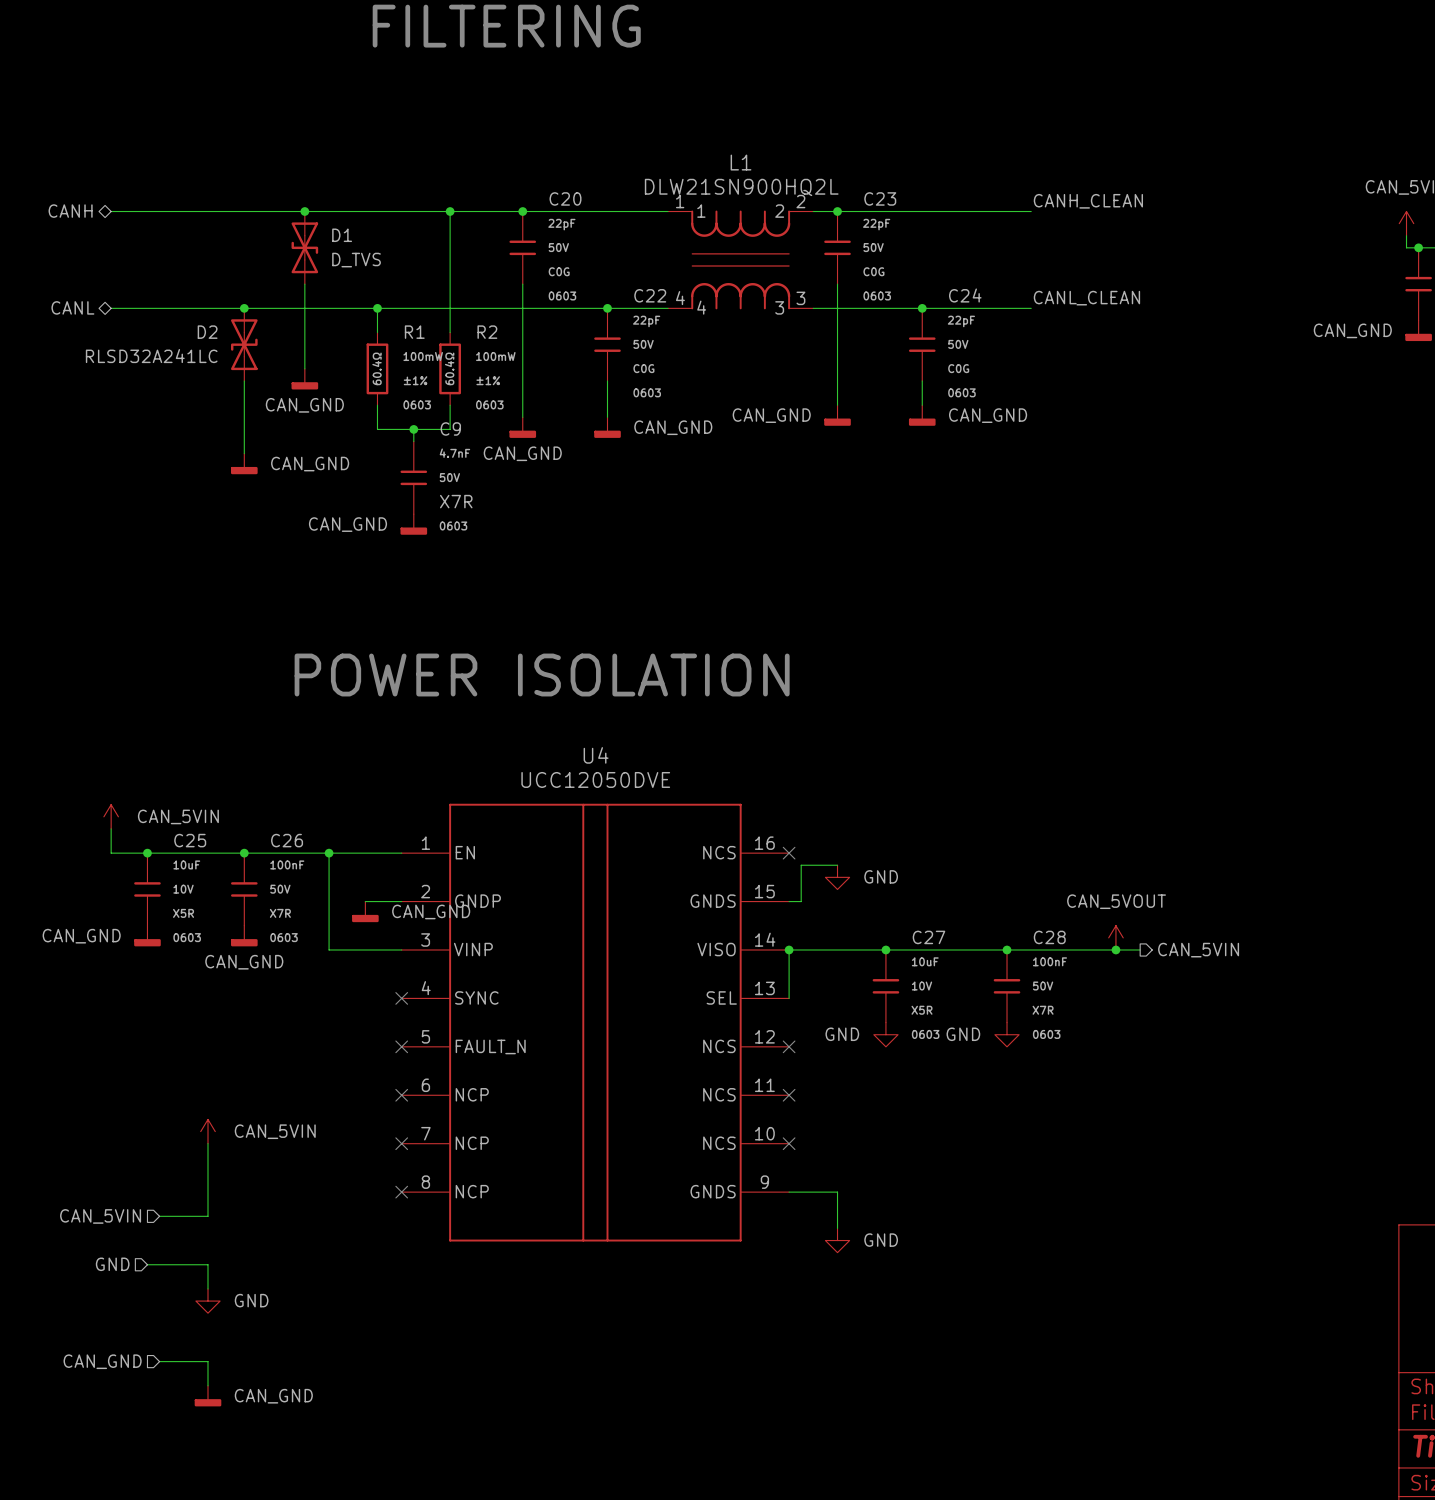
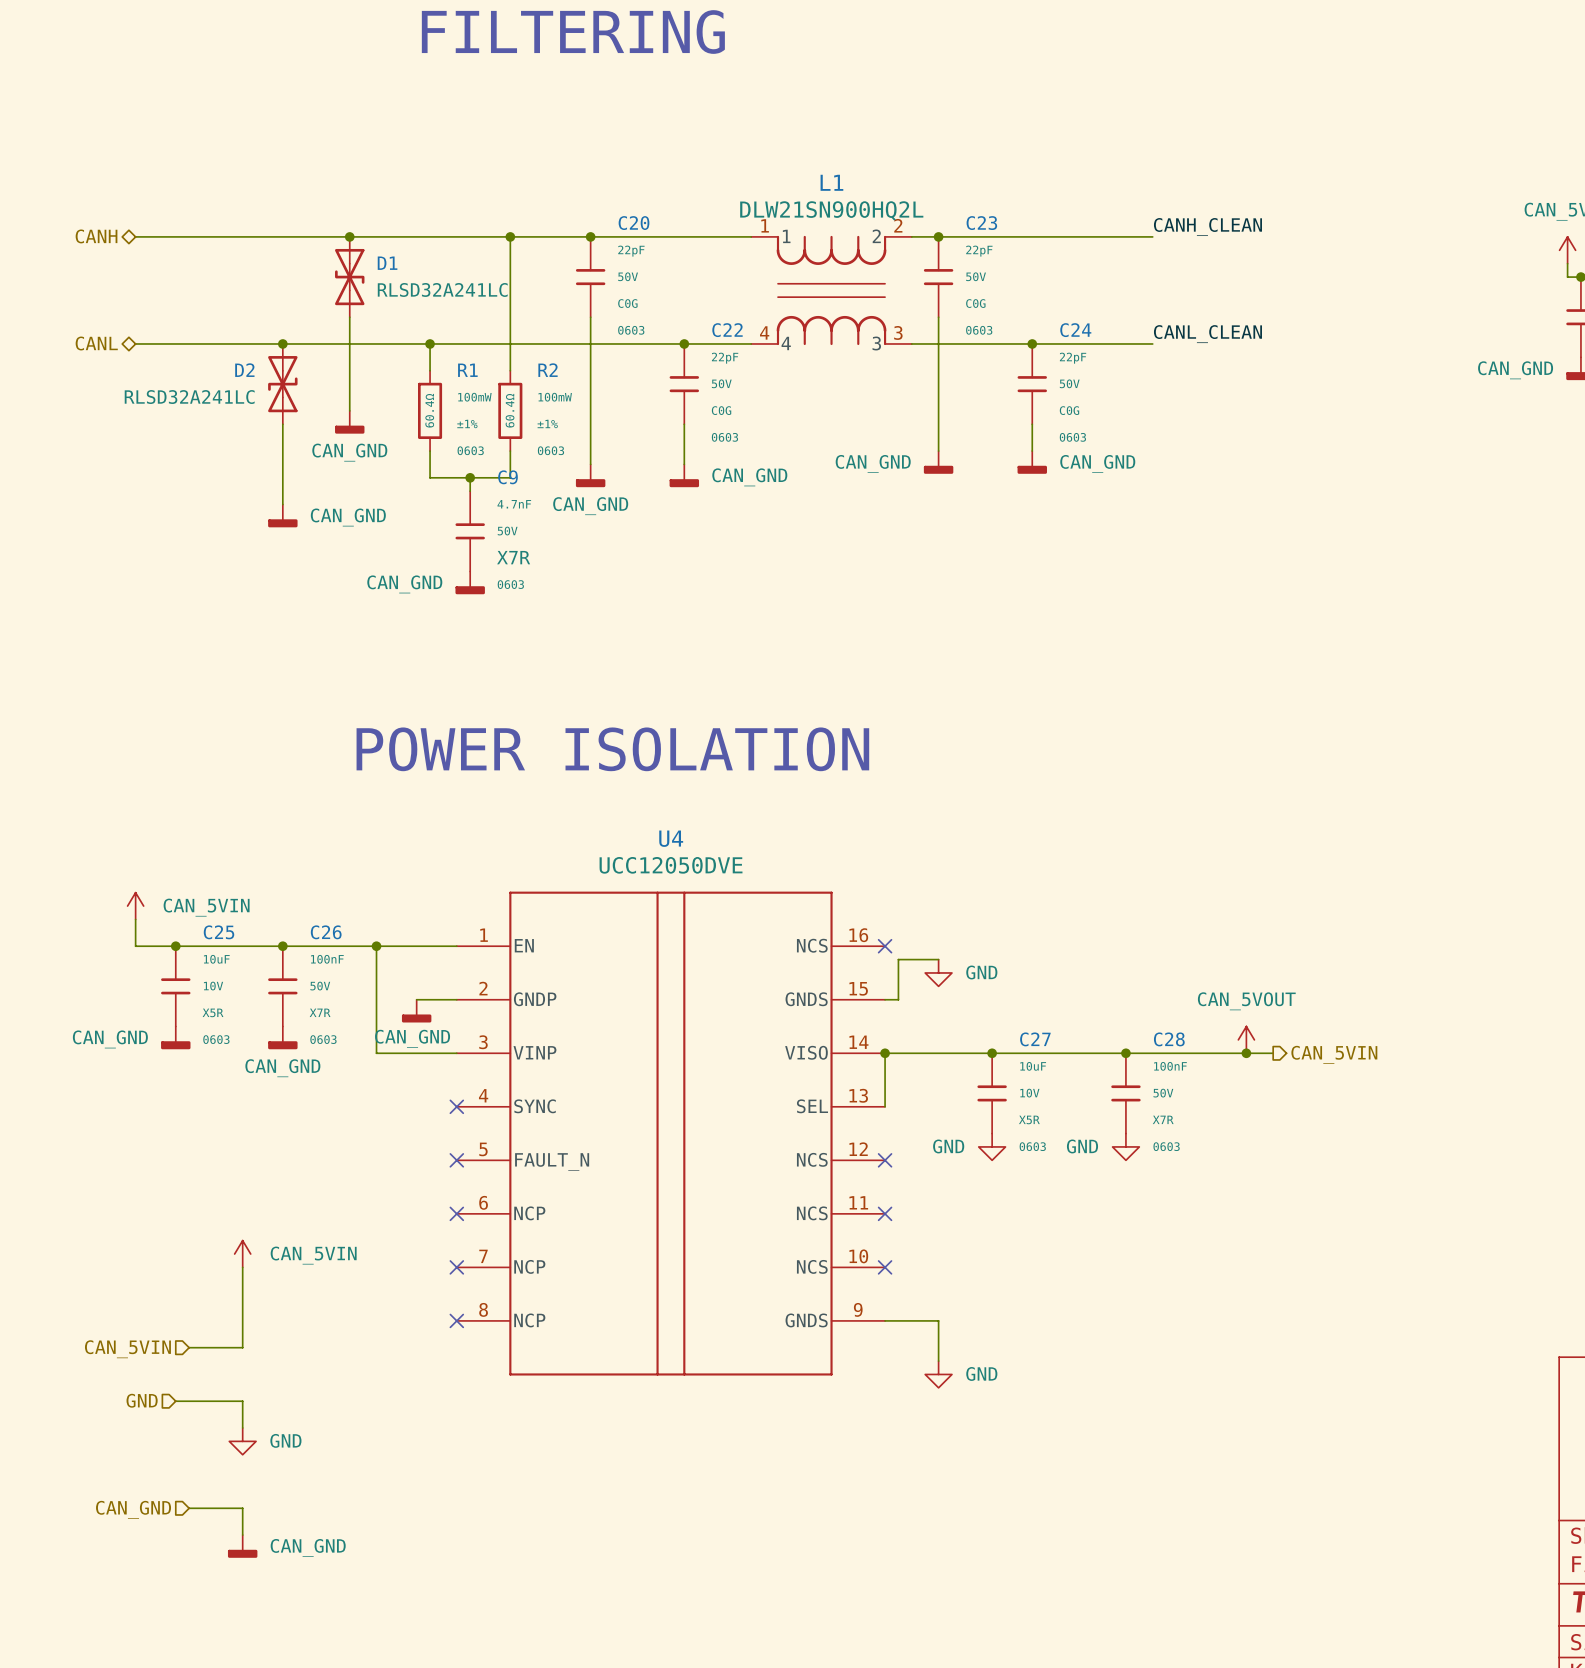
D1 value: D_TVS (356, 260) -> RLSD32A241LC (442, 289)
power symbol text position: CAN_GND (431, 911) -> CAN_GND (412, 1038)

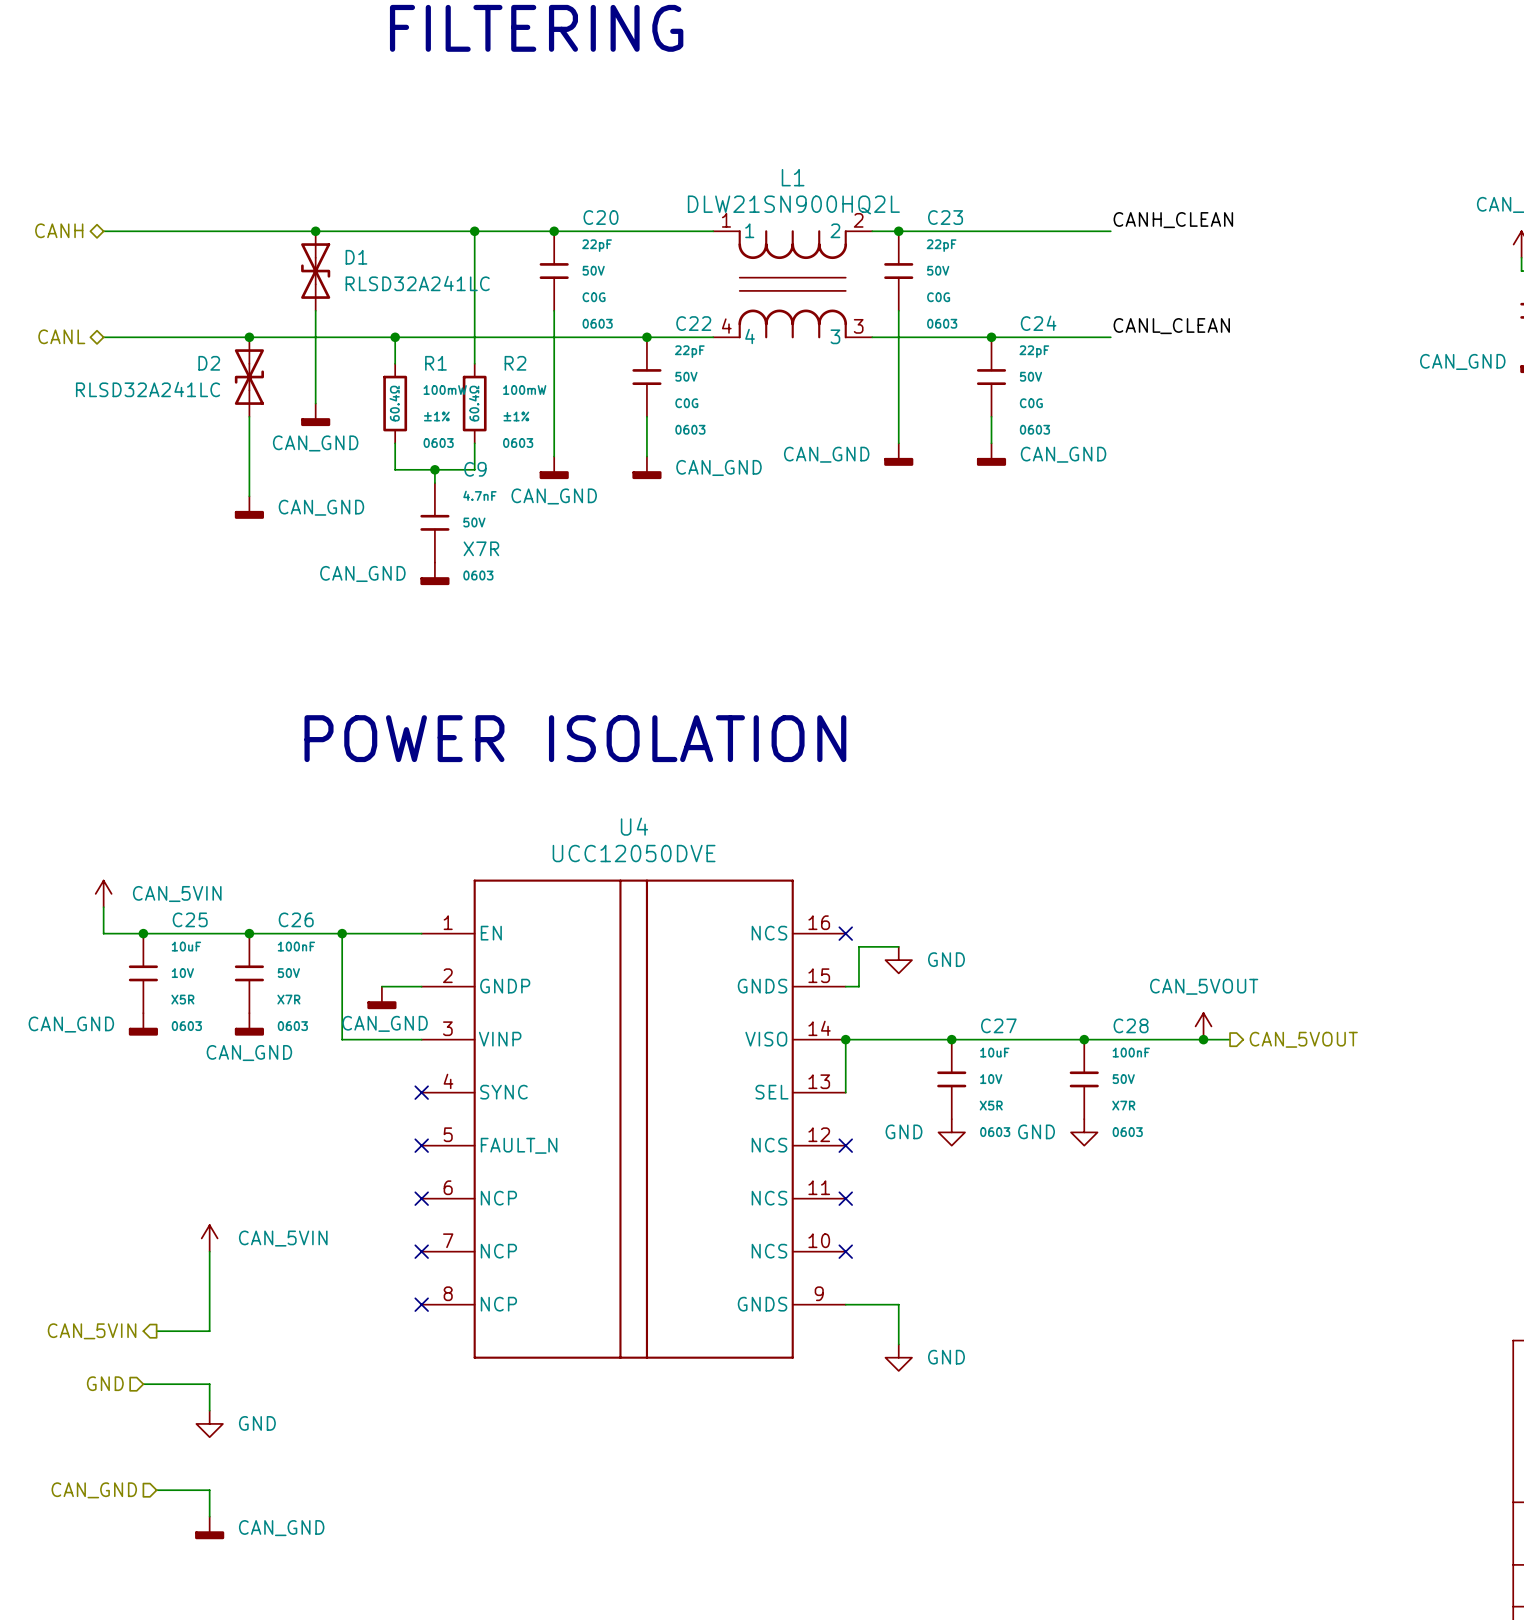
hierarchical label: CAN_5VIN (1334, 1054) -> CAN_5VOUT (1303, 1039)
hierarchical label shape: input (127, 1349) -> output (92, 1331)

